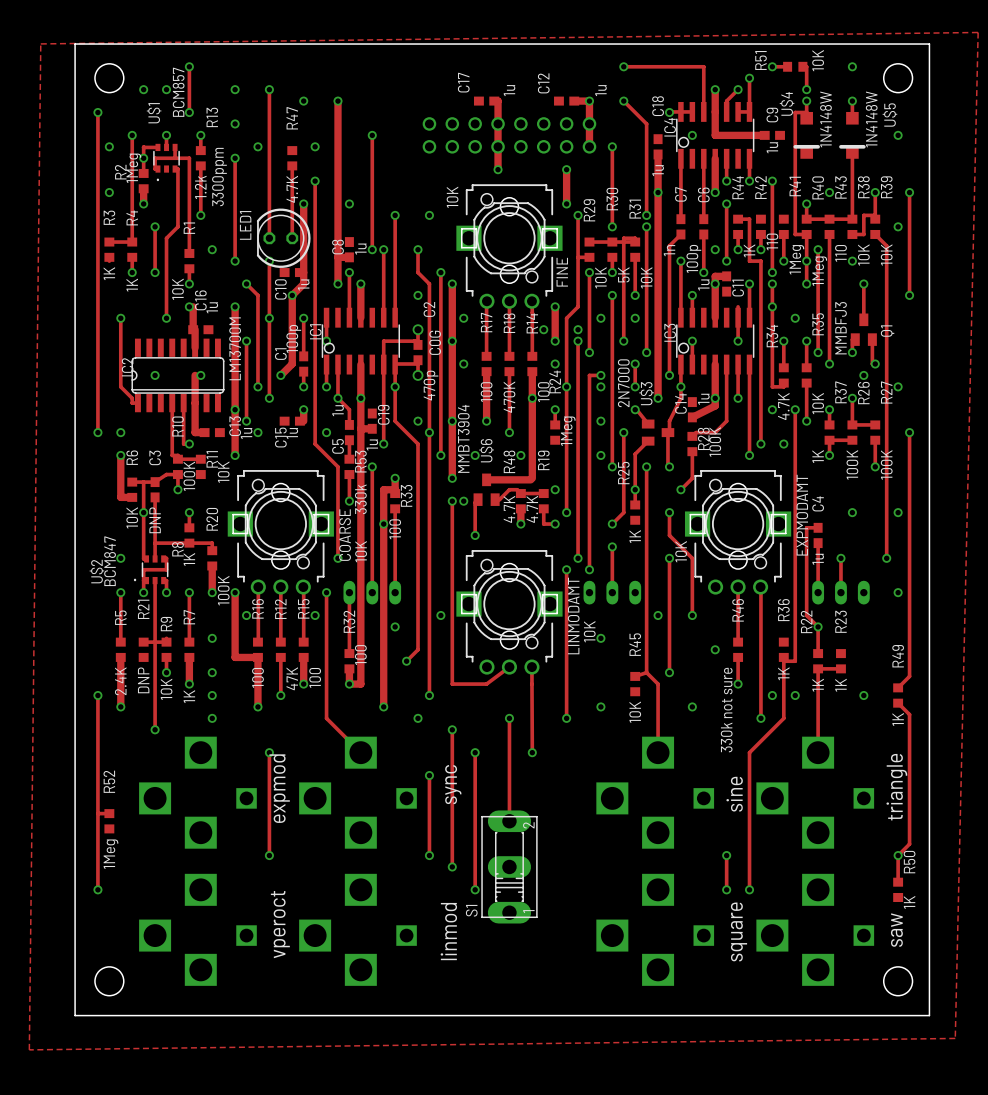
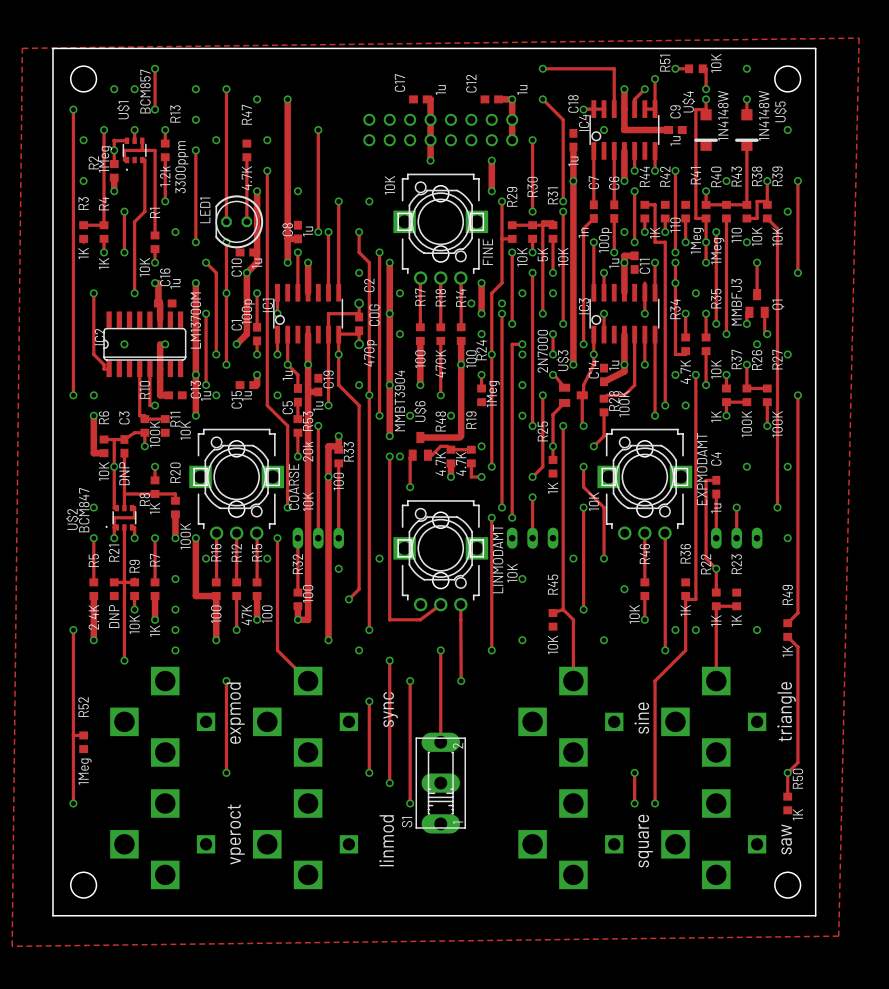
R53 value: 330k (360, 499) -> 20k (308, 451)
R46 value: 330k not sure (726, 710) -> 10K (634, 614)

